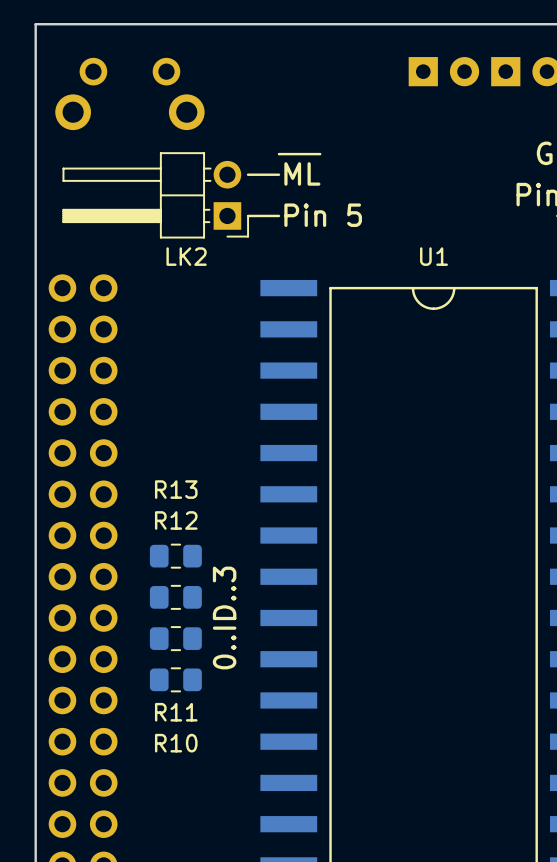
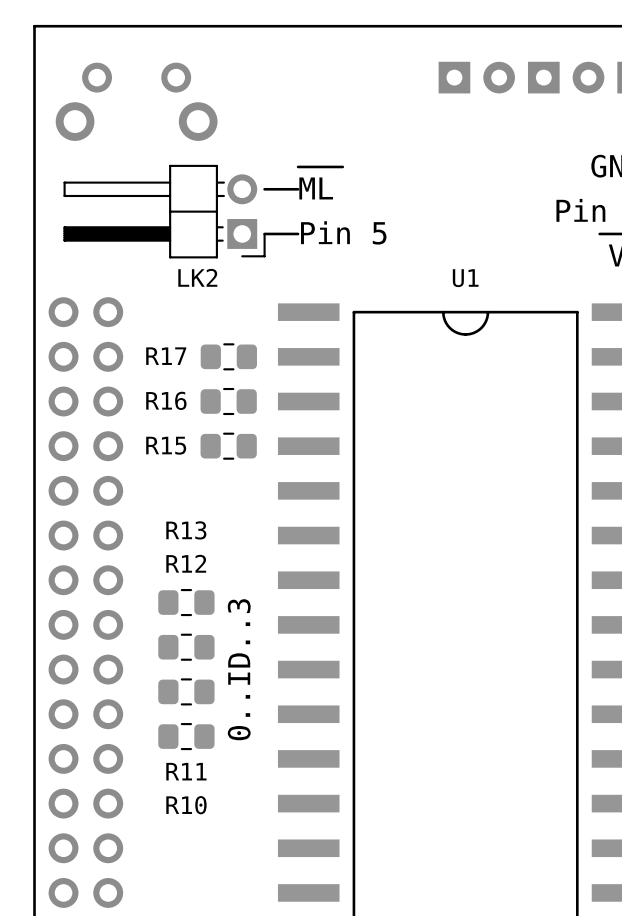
R17: none -> (228, 356)
R16: none -> (228, 401)
R15: none -> (228, 446)

